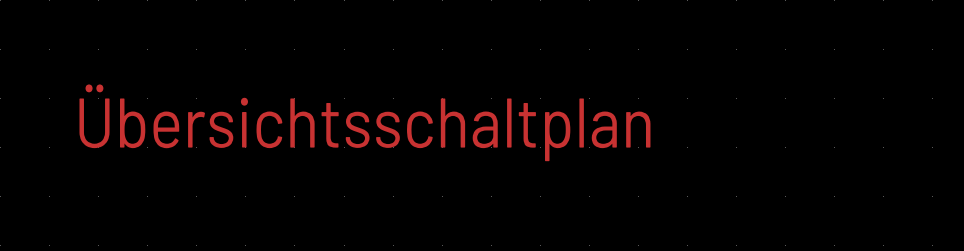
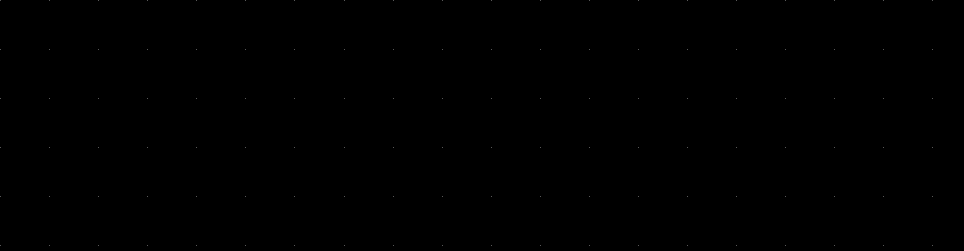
text: Übersichtsschaltplan (364, 122) -> none

